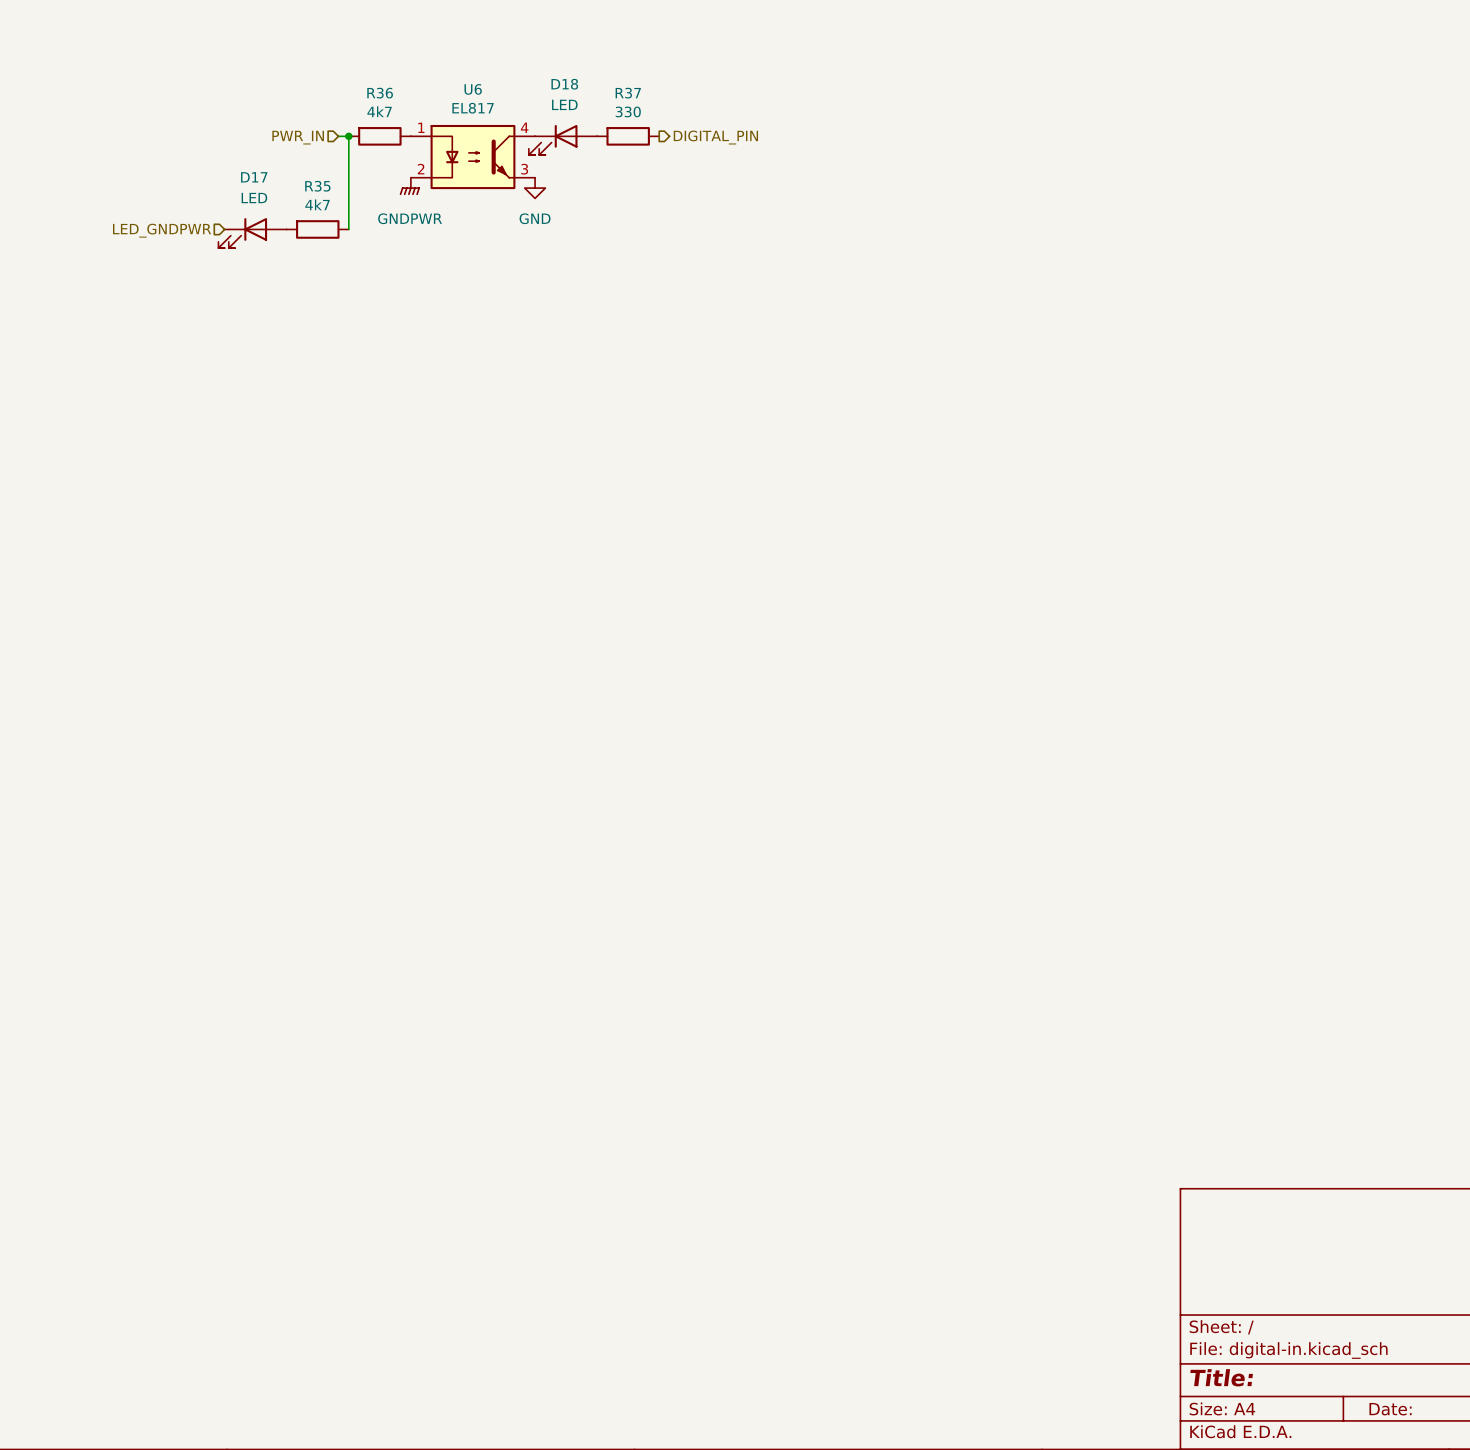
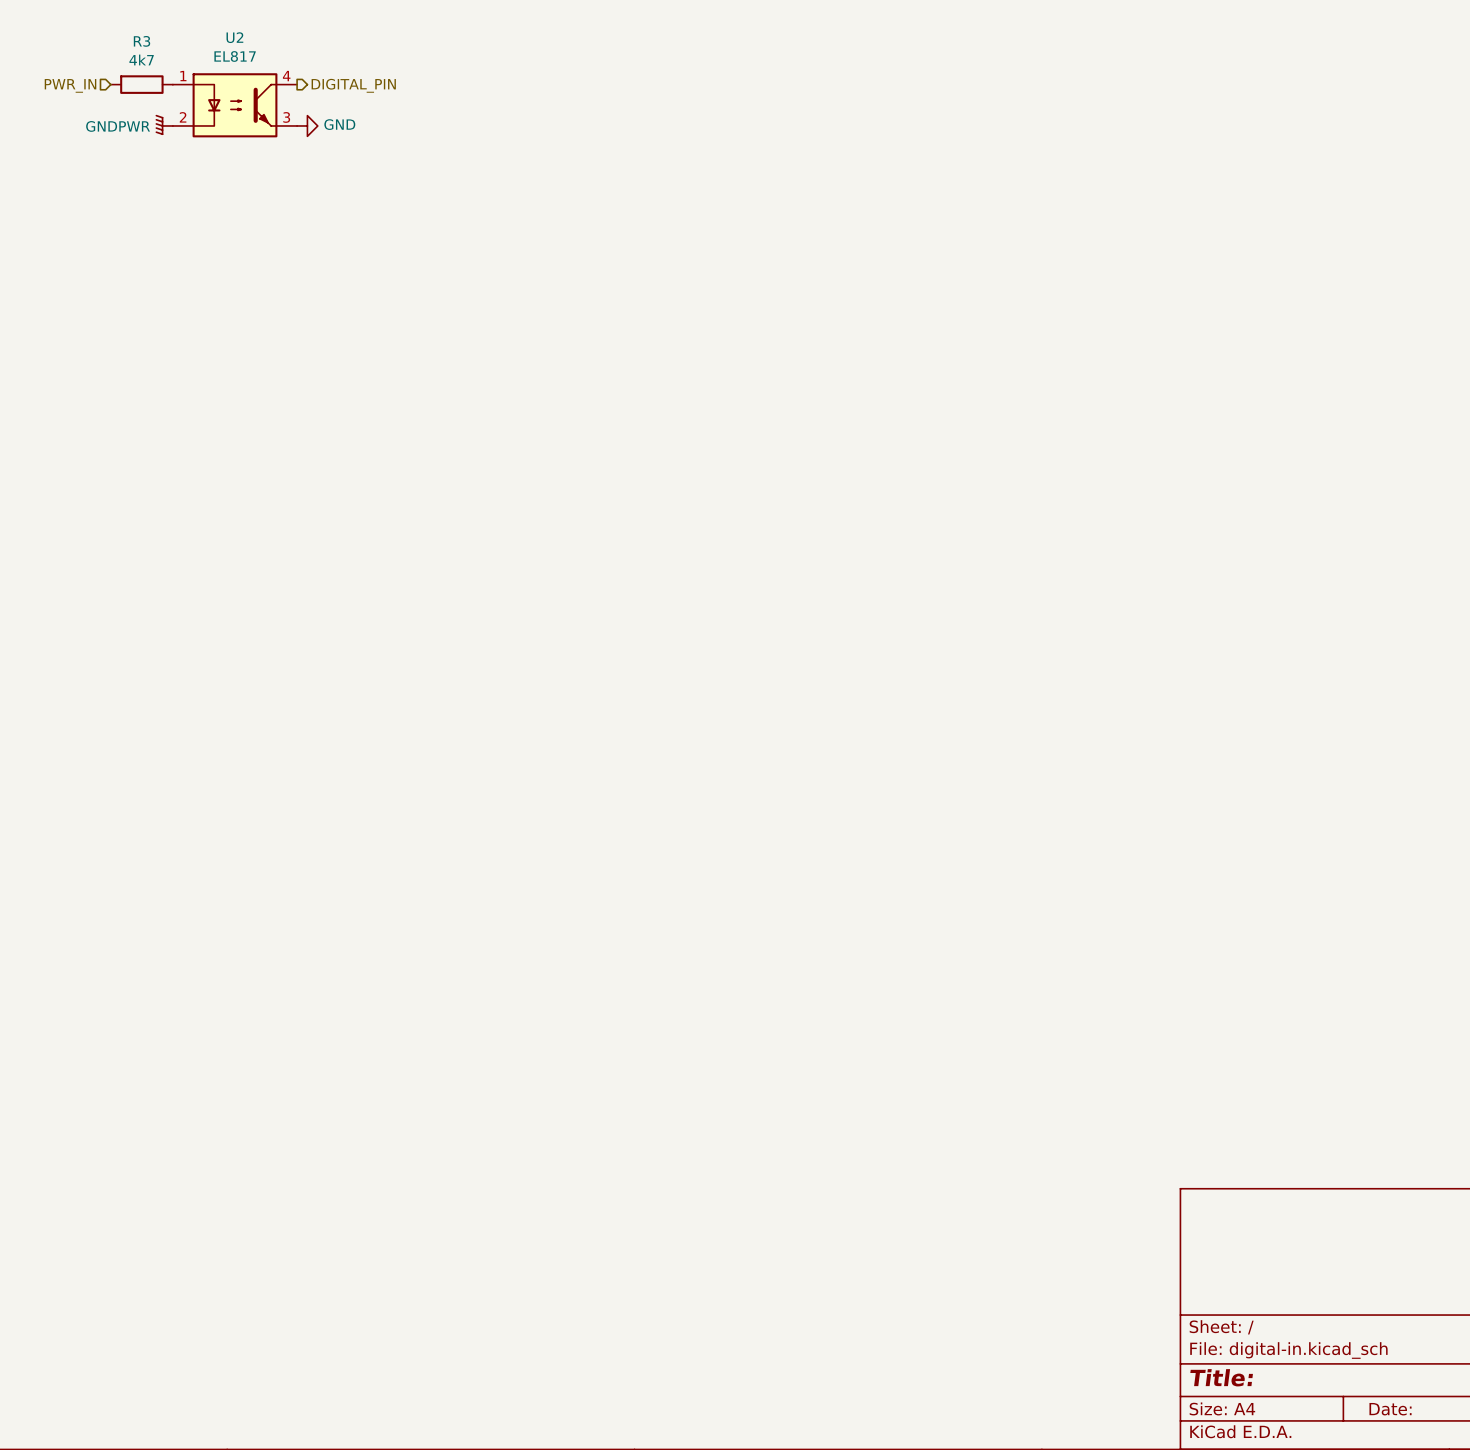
R3: none -> 4k7 (141, 84)
hierarchical label: none -> PWR_IN (70, 85)
hierarchical label: none -> DIGITAL_PIN (353, 85)
U2: none -> EL817 (235, 105)
power symbol: none -> GNDPWR (164, 124)
power symbol: none -> GND (307, 125)
wire: (338, 136) (348, 136) (348, 229) -> none
junction: (348, 136) -> none
R36: 4k7 (379, 136) -> none
R37: 330 (628, 136) -> none
hierarchical label: PWR_IN (298, 137) -> none
hierarchical label: DIGITAL_PIN (715, 137) -> none
D18: LED (563, 139) -> none
U6: EL817 (472, 157) -> none
power symbol: GNDPWR (409, 186) -> none
power symbol: GND (535, 188) -> none
R35: 4k7 (317, 229) -> none
hierarchical label: LED_GNDPWR (162, 230) -> none
D17: LED (252, 233) -> none

